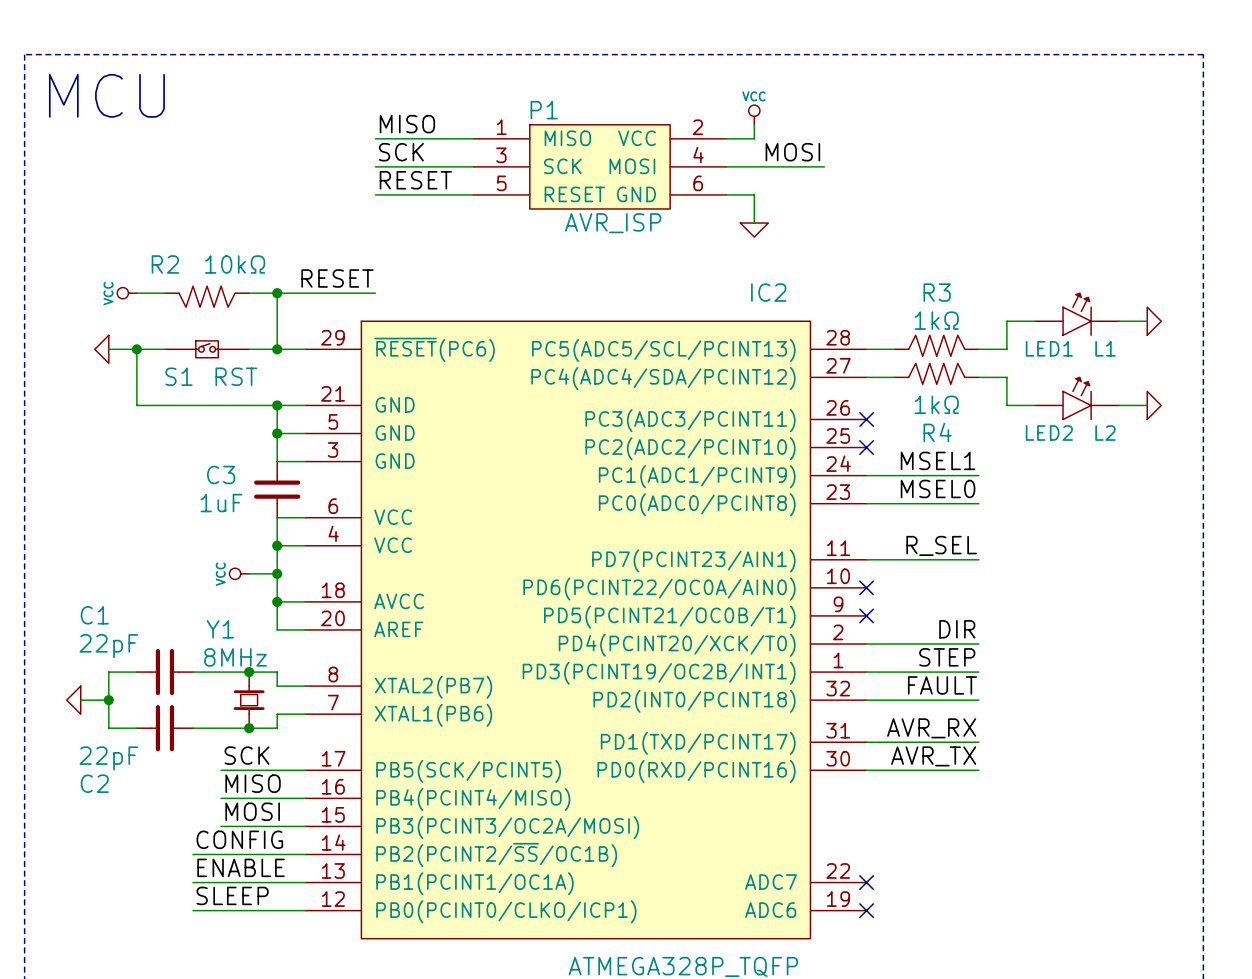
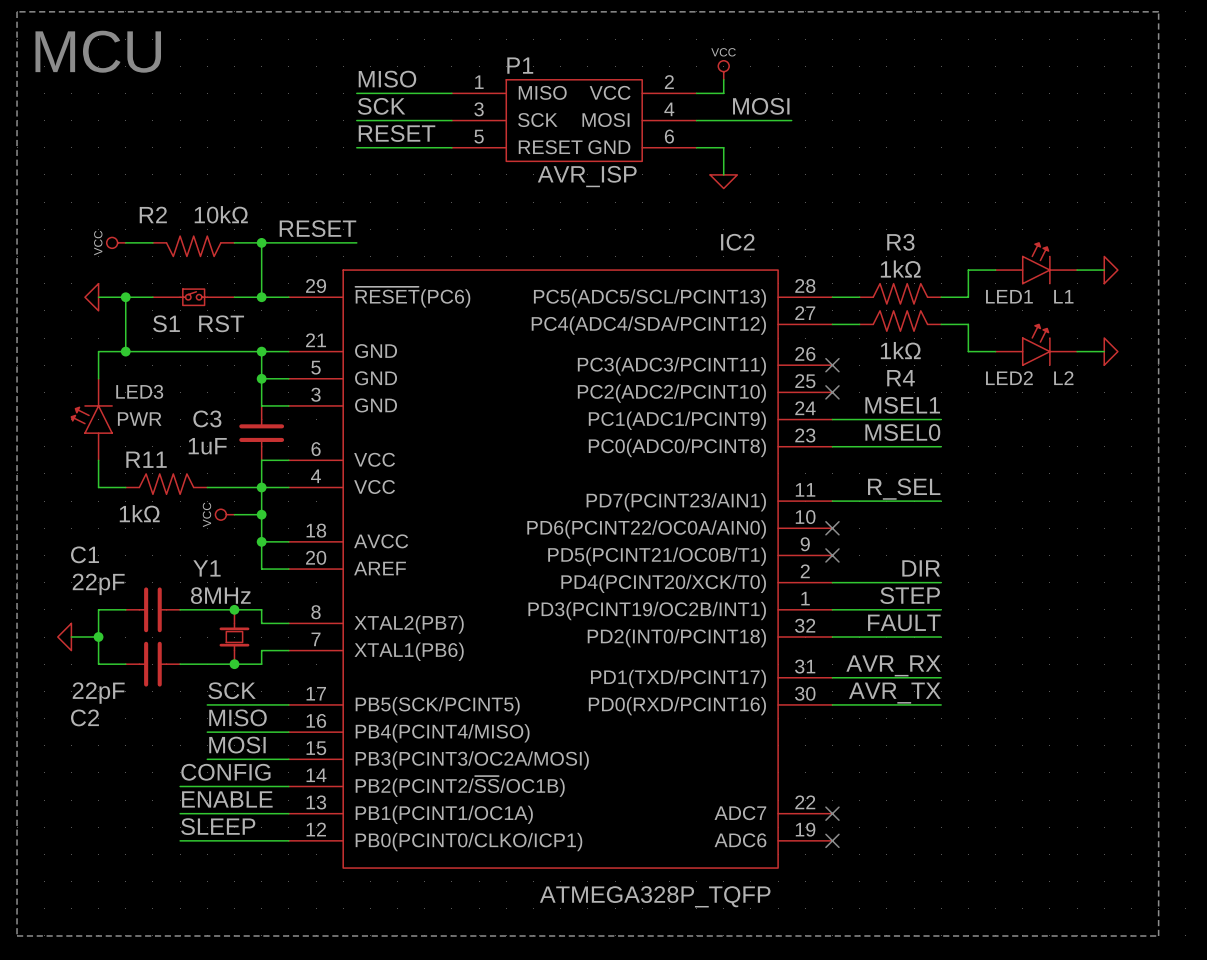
wire: none -> (125, 351) (98, 351) (98, 378)
junction: none -> (125, 351)
LED3: none -> PWR (91, 419)
wire: none -> (98, 460) (98, 487) (125, 487)
R11: none -> 1kΩ (166, 484)
wire: none -> (207, 487) (261, 487)

